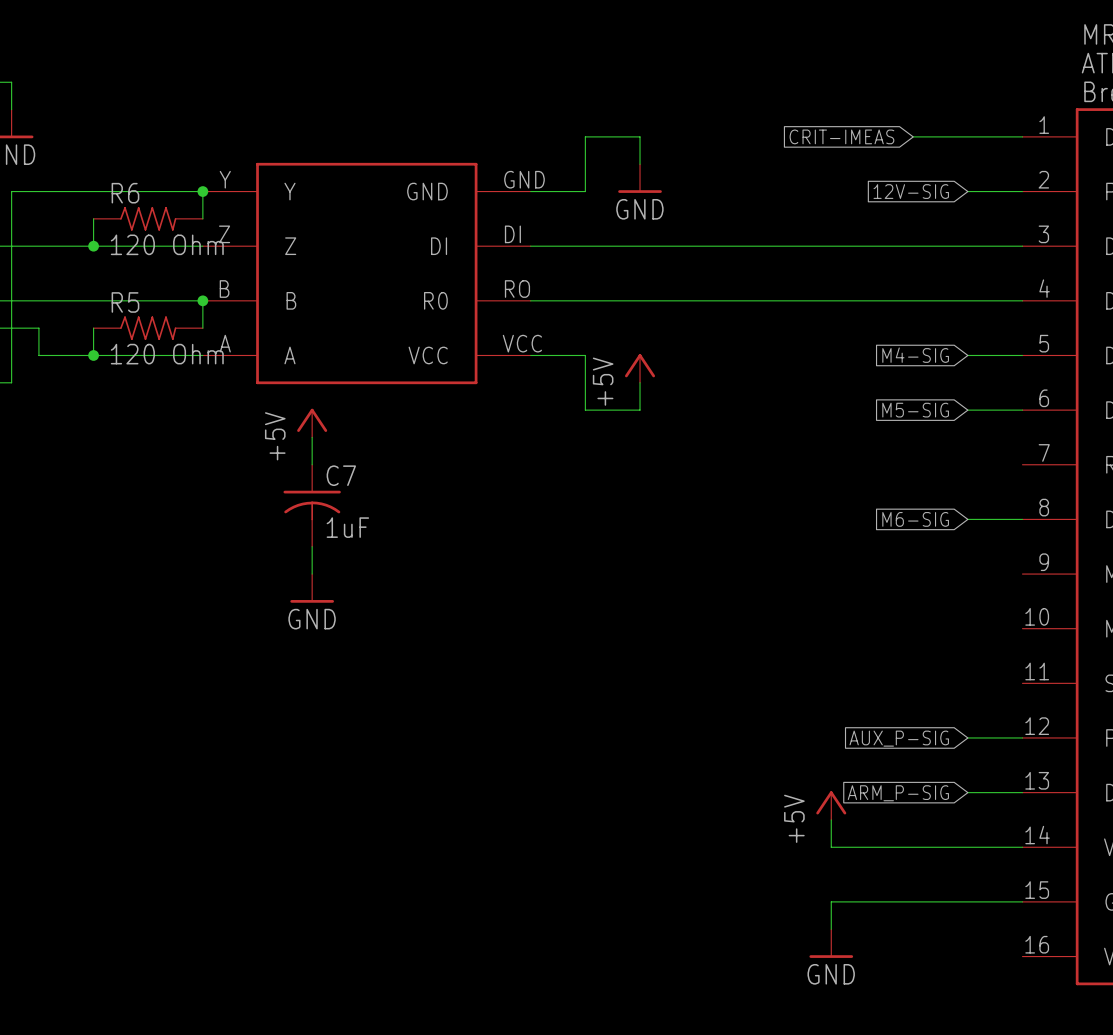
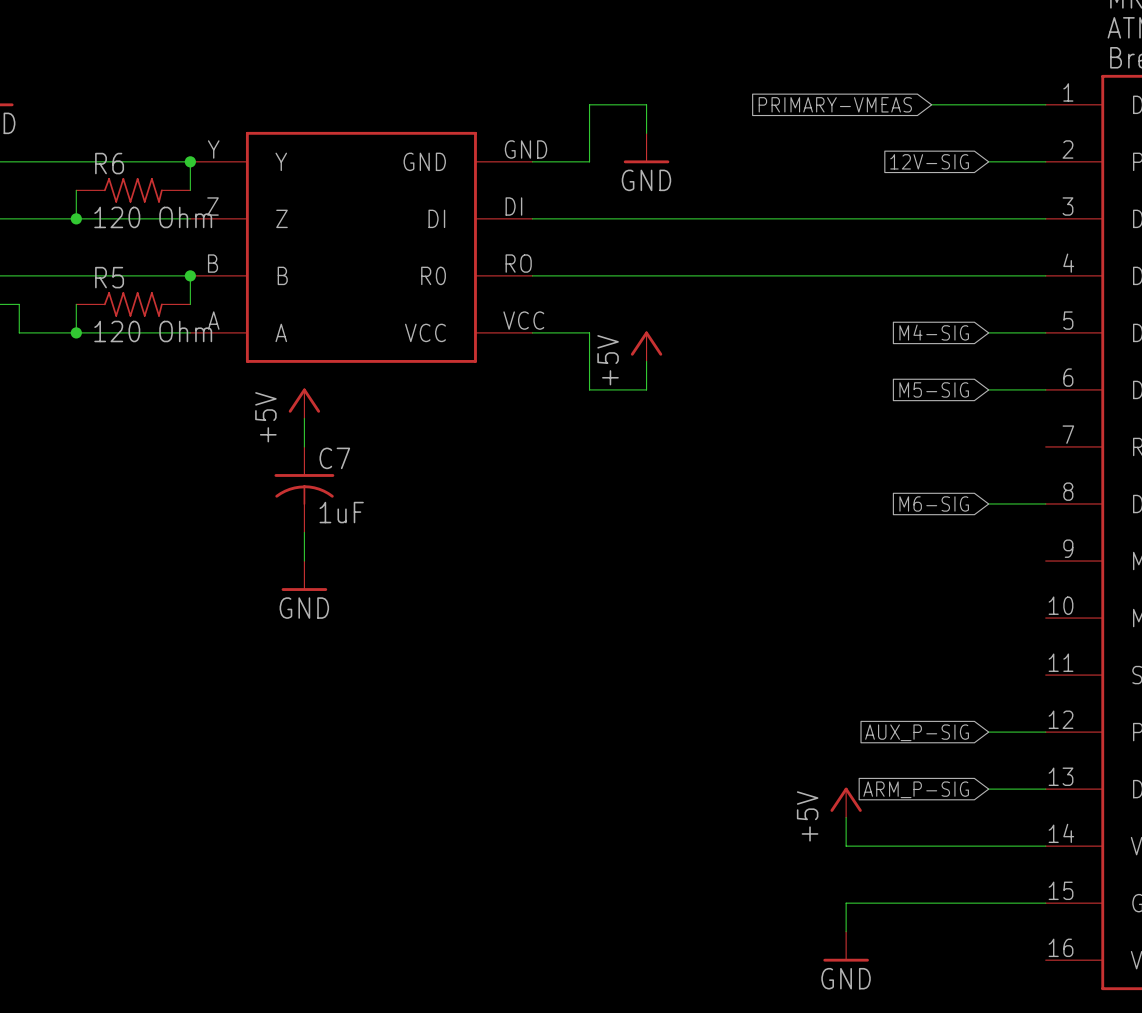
global label: CRIT-IMEAS (841, 136) -> PRIMARY-VMEAS (835, 104)

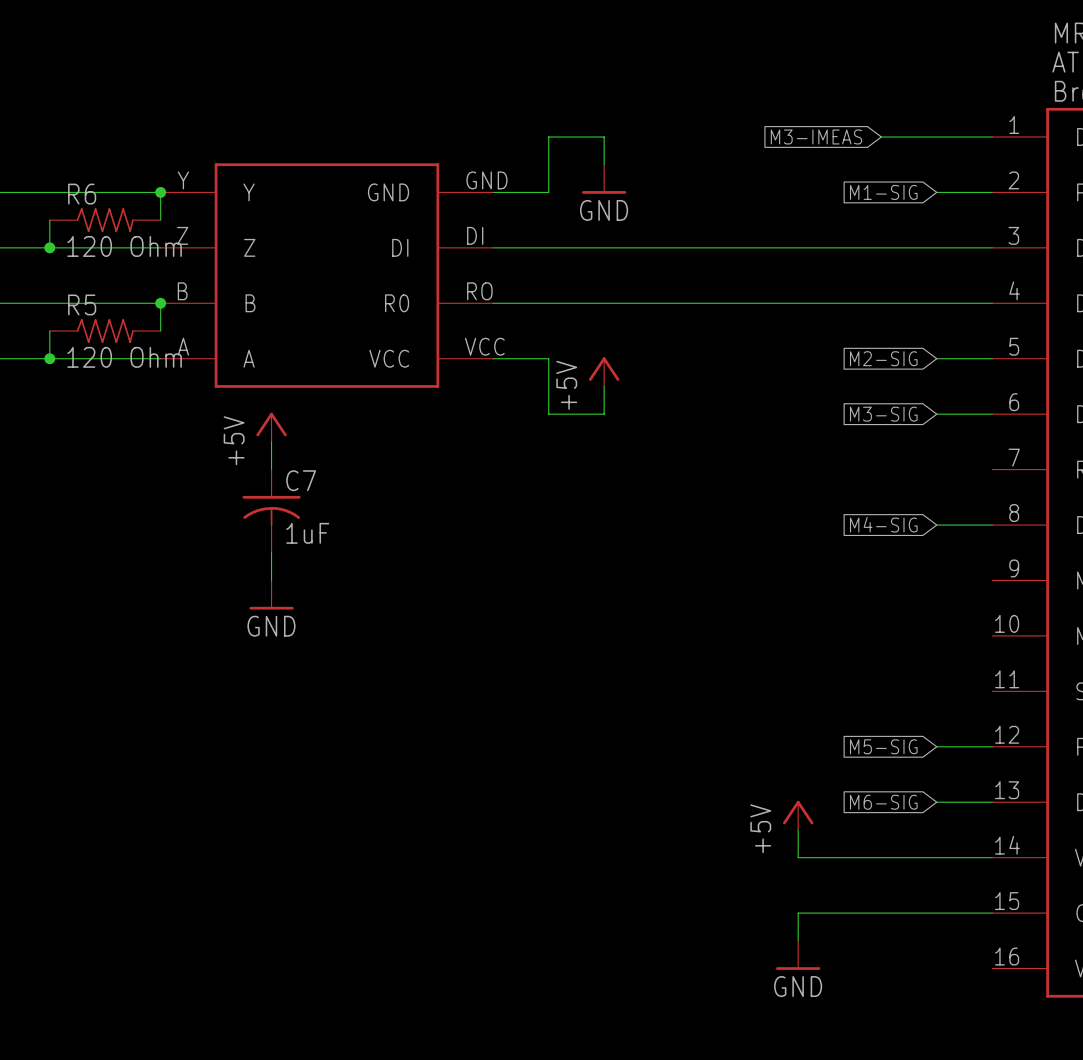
global label: PRIMARY-VMEAS (835, 104) -> M3-IMEAS (816, 136)
global label: 12V-SIG (929, 161) -> M1-SIG (883, 192)
global label: M4-SIG (934, 332) -> M2-SIG (883, 358)
global label: M5-SIG (934, 389) -> M3-SIG (883, 414)
global label: M6-SIG (934, 503) -> M4-SIG (883, 524)
global label: AUX_P-SIG (917, 732) -> M5-SIG (883, 746)
global label: ARM_P-SIG (916, 789) -> M6-SIG (883, 802)

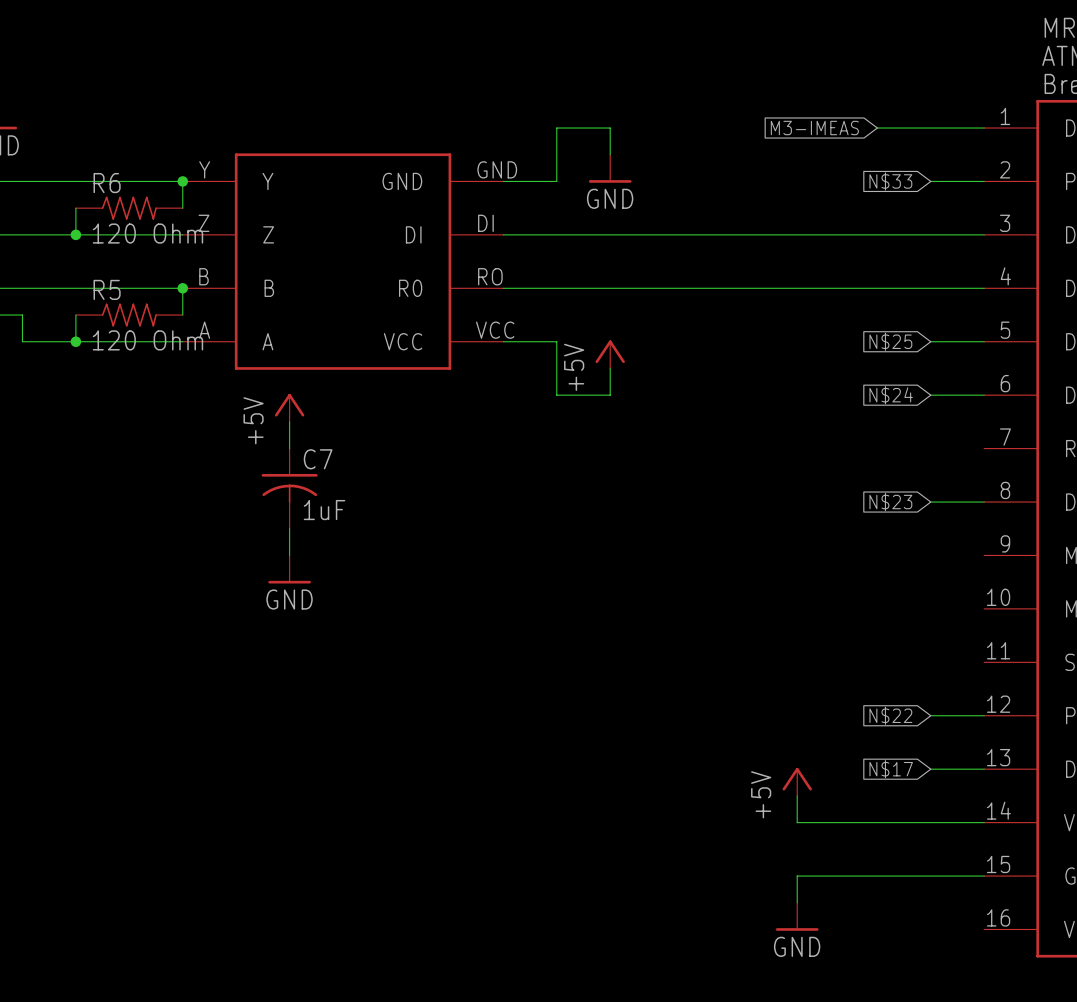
global label: M1-SIG (883, 192) -> N$33 (890, 181)
global label: M2-SIG (883, 358) -> N$25 (890, 341)
global label: M3-SIG (883, 414) -> N$24 (891, 395)
global label: M4-SIG (883, 524) -> N$23 (890, 502)
global label: M5-SIG (883, 746) -> N$22 (890, 715)
global label: M6-SIG (883, 802) -> N$17 (891, 769)

